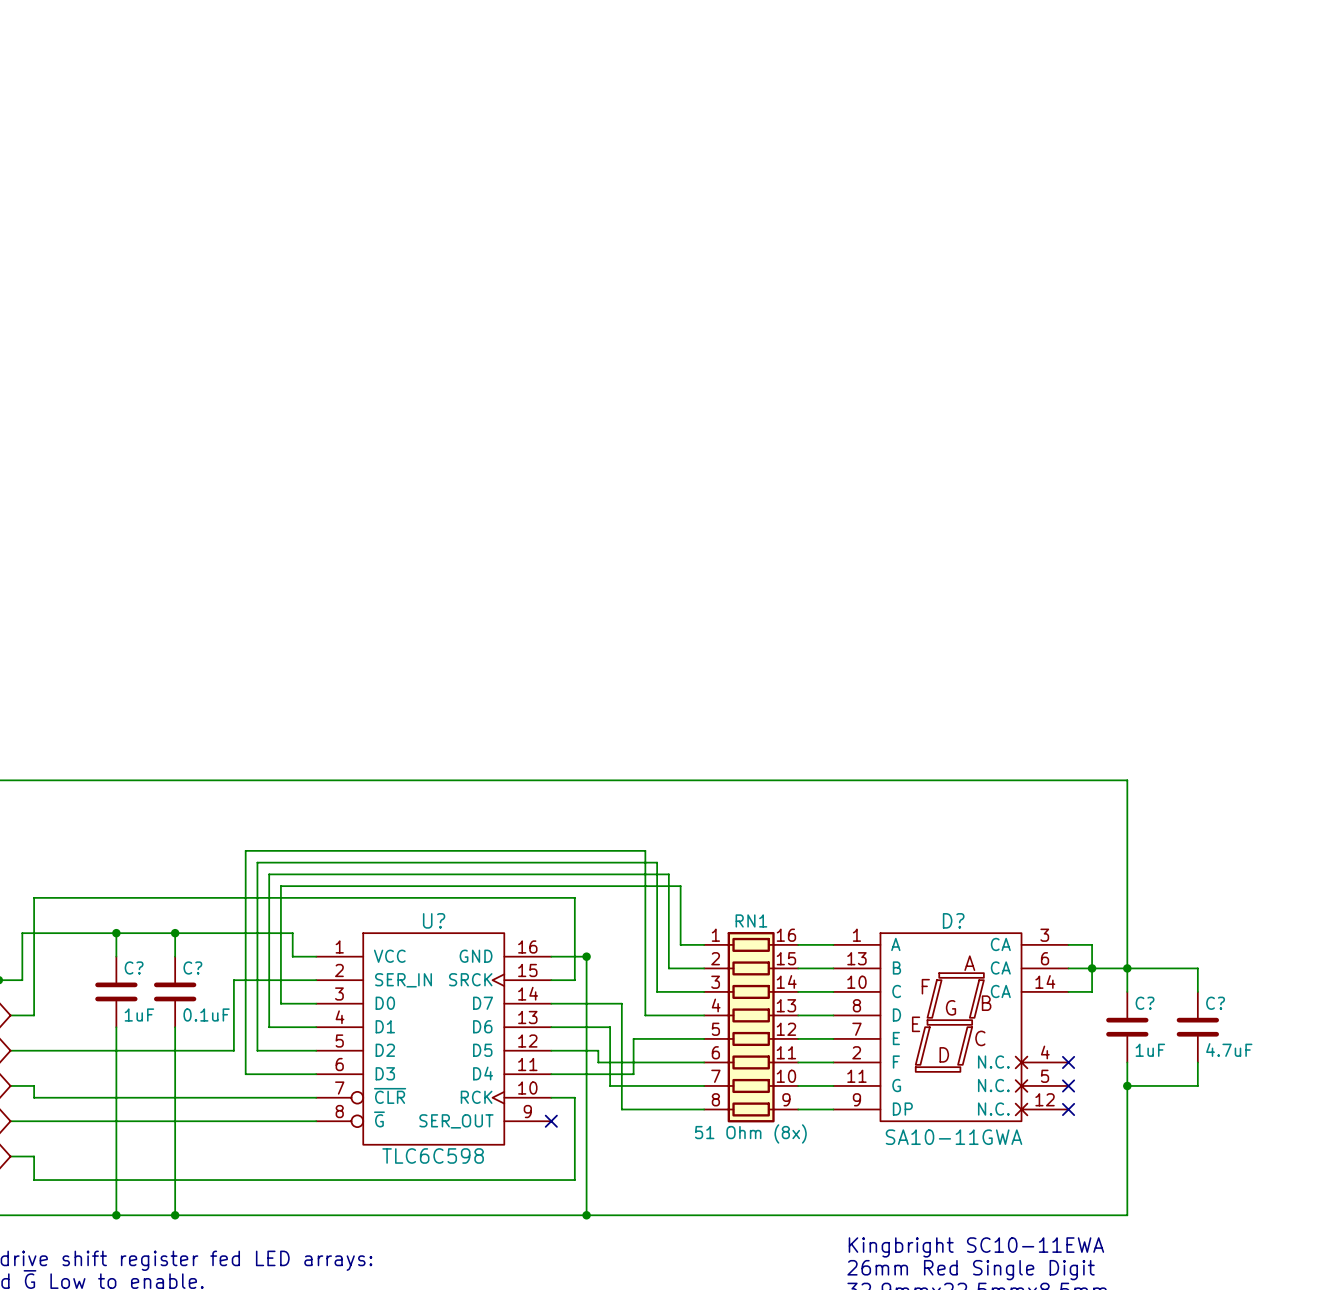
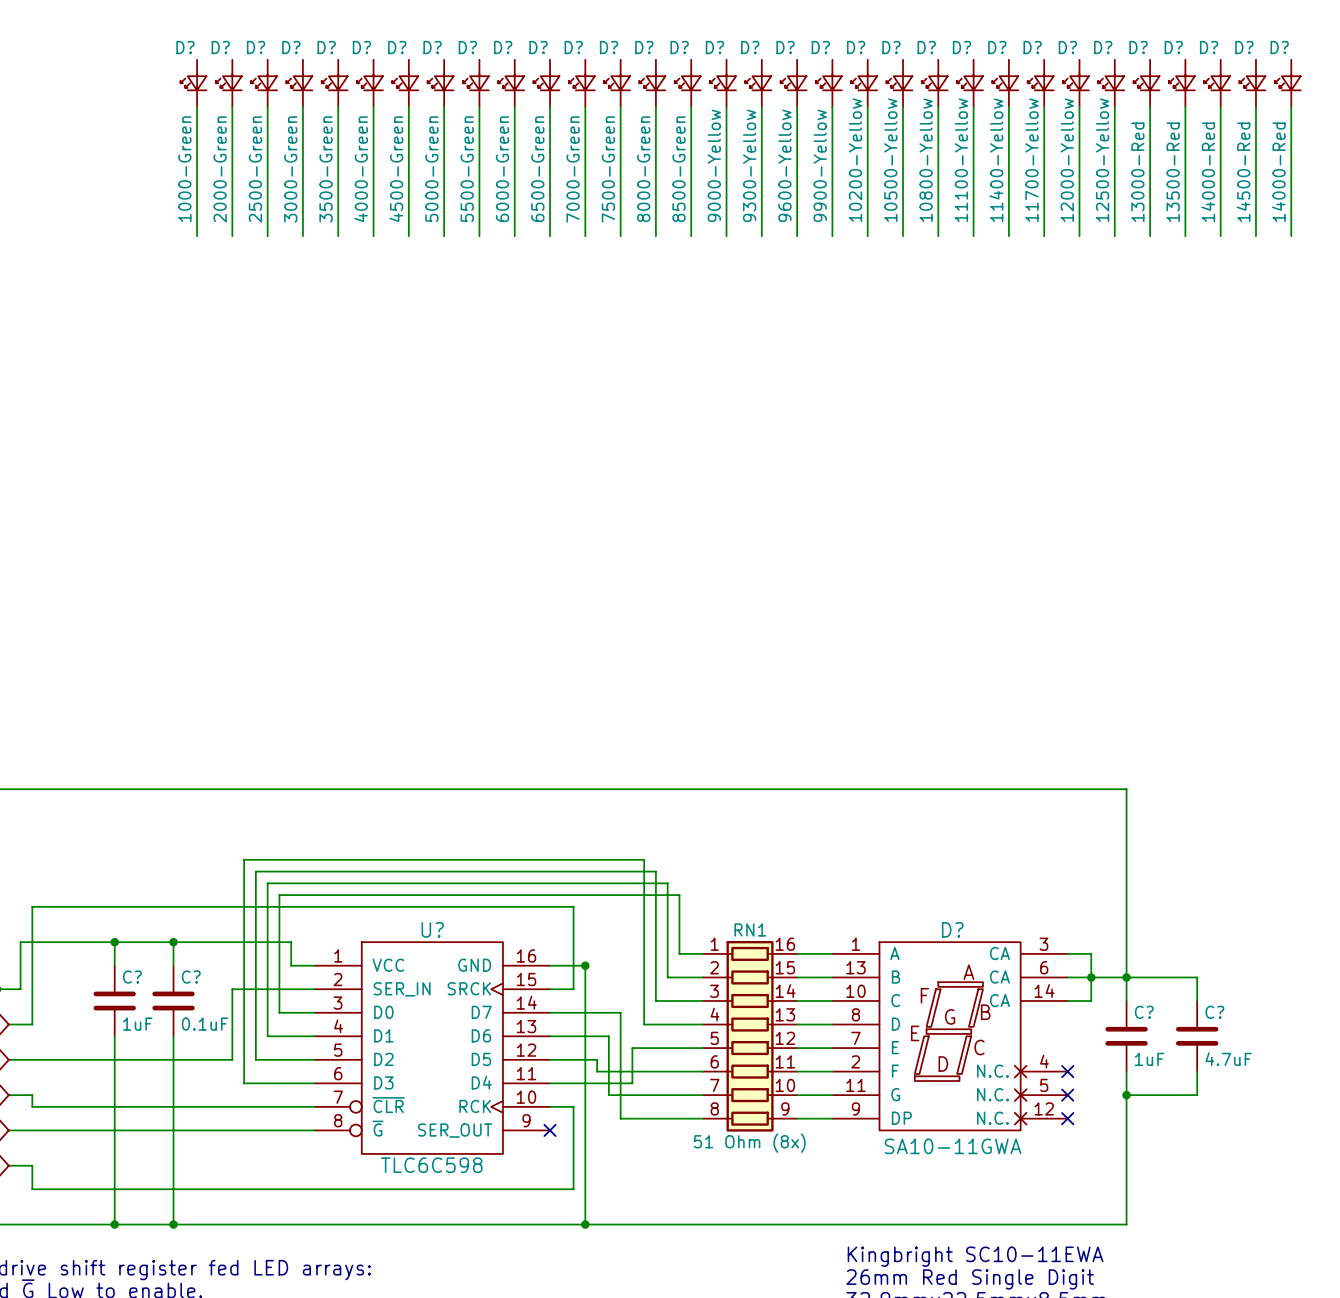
D?: none -> 1000-Green (193, 83)
D?: none -> 2000-Green (228, 83)
D?: none -> 2500-Green (264, 83)
D?: none -> 3000-Green (299, 83)
D?: none -> 3500-Green (334, 83)
D?: none -> 4000-Green (370, 83)
D?: none -> 4500-Green (405, 83)
D?: none -> 5000-Green (440, 83)
D?: none -> 5500-Green (475, 83)
D?: none -> 6000-Green (511, 83)
D?: none -> 6500-Green (546, 83)
D?: none -> 7000-Green (581, 83)
D?: none -> 7500-Green (617, 83)
D?: none -> 8000-Green (652, 83)
D?: none -> 8500-Green (687, 83)
D?: none -> 9000-Yellow (722, 83)
D?: none -> 9300-Yellow (758, 83)
D?: none -> 9600-Yellow (793, 83)
D?: none -> 9900-Yellow (828, 83)
D?: none -> 10200-Yellow (864, 83)
D?: none -> 10500-Yellow (899, 83)
D?: none -> 10800-Yellow (934, 83)
D?: none -> 11100-Yellow (970, 83)
D?: none -> 11400-Yellow (1005, 83)
D?: none -> 11700-Yellow (1040, 83)
D?: none -> 12000-Yellow (1075, 83)
D?: none -> 12500-Yellow (1111, 83)
D?: none -> 13000-Red (1146, 83)
D?: none -> 13500-Red (1181, 83)
D?: none -> 14000-Red (1217, 83)
D?: none -> 14500-Red (1252, 83)
D?: none -> 14000-Red (1287, 83)
wire: none -> (197, 106) (197, 236)
wire: none -> (232, 106) (232, 236)
wire: none -> (267, 106) (267, 236)
wire: none -> (302, 106) (302, 236)
wire: none -> (338, 106) (338, 236)
wire: none -> (373, 106) (373, 236)
wire: none -> (408, 106) (408, 236)
wire: none -> (444, 106) (444, 236)
wire: none -> (479, 106) (479, 236)
wire: none -> (514, 106) (514, 236)
wire: none -> (550, 106) (550, 236)
wire: none -> (585, 106) (585, 236)
wire: none -> (620, 106) (620, 236)
wire: none -> (655, 106) (655, 236)
wire: none -> (691, 106) (691, 236)
wire: none -> (726, 106) (726, 236)
wire: none -> (761, 106) (761, 236)
wire: none -> (797, 106) (797, 236)
wire: none -> (832, 106) (832, 236)
wire: none -> (867, 106) (867, 236)
wire: none -> (903, 106) (903, 236)
wire: none -> (938, 106) (938, 236)
wire: none -> (973, 106) (973, 236)
wire: none -> (1008, 106) (1008, 236)
wire: none -> (1044, 106) (1044, 236)
wire: none -> (1079, 106) (1079, 236)
wire: none -> (1114, 106) (1114, 236)
wire: none -> (1150, 106) (1150, 236)
wire: none -> (1185, 106) (1185, 236)
wire: none -> (1220, 106) (1220, 236)
wire: none -> (1255, 106) (1255, 236)
wire: none -> (1291, 106) (1291, 236)

